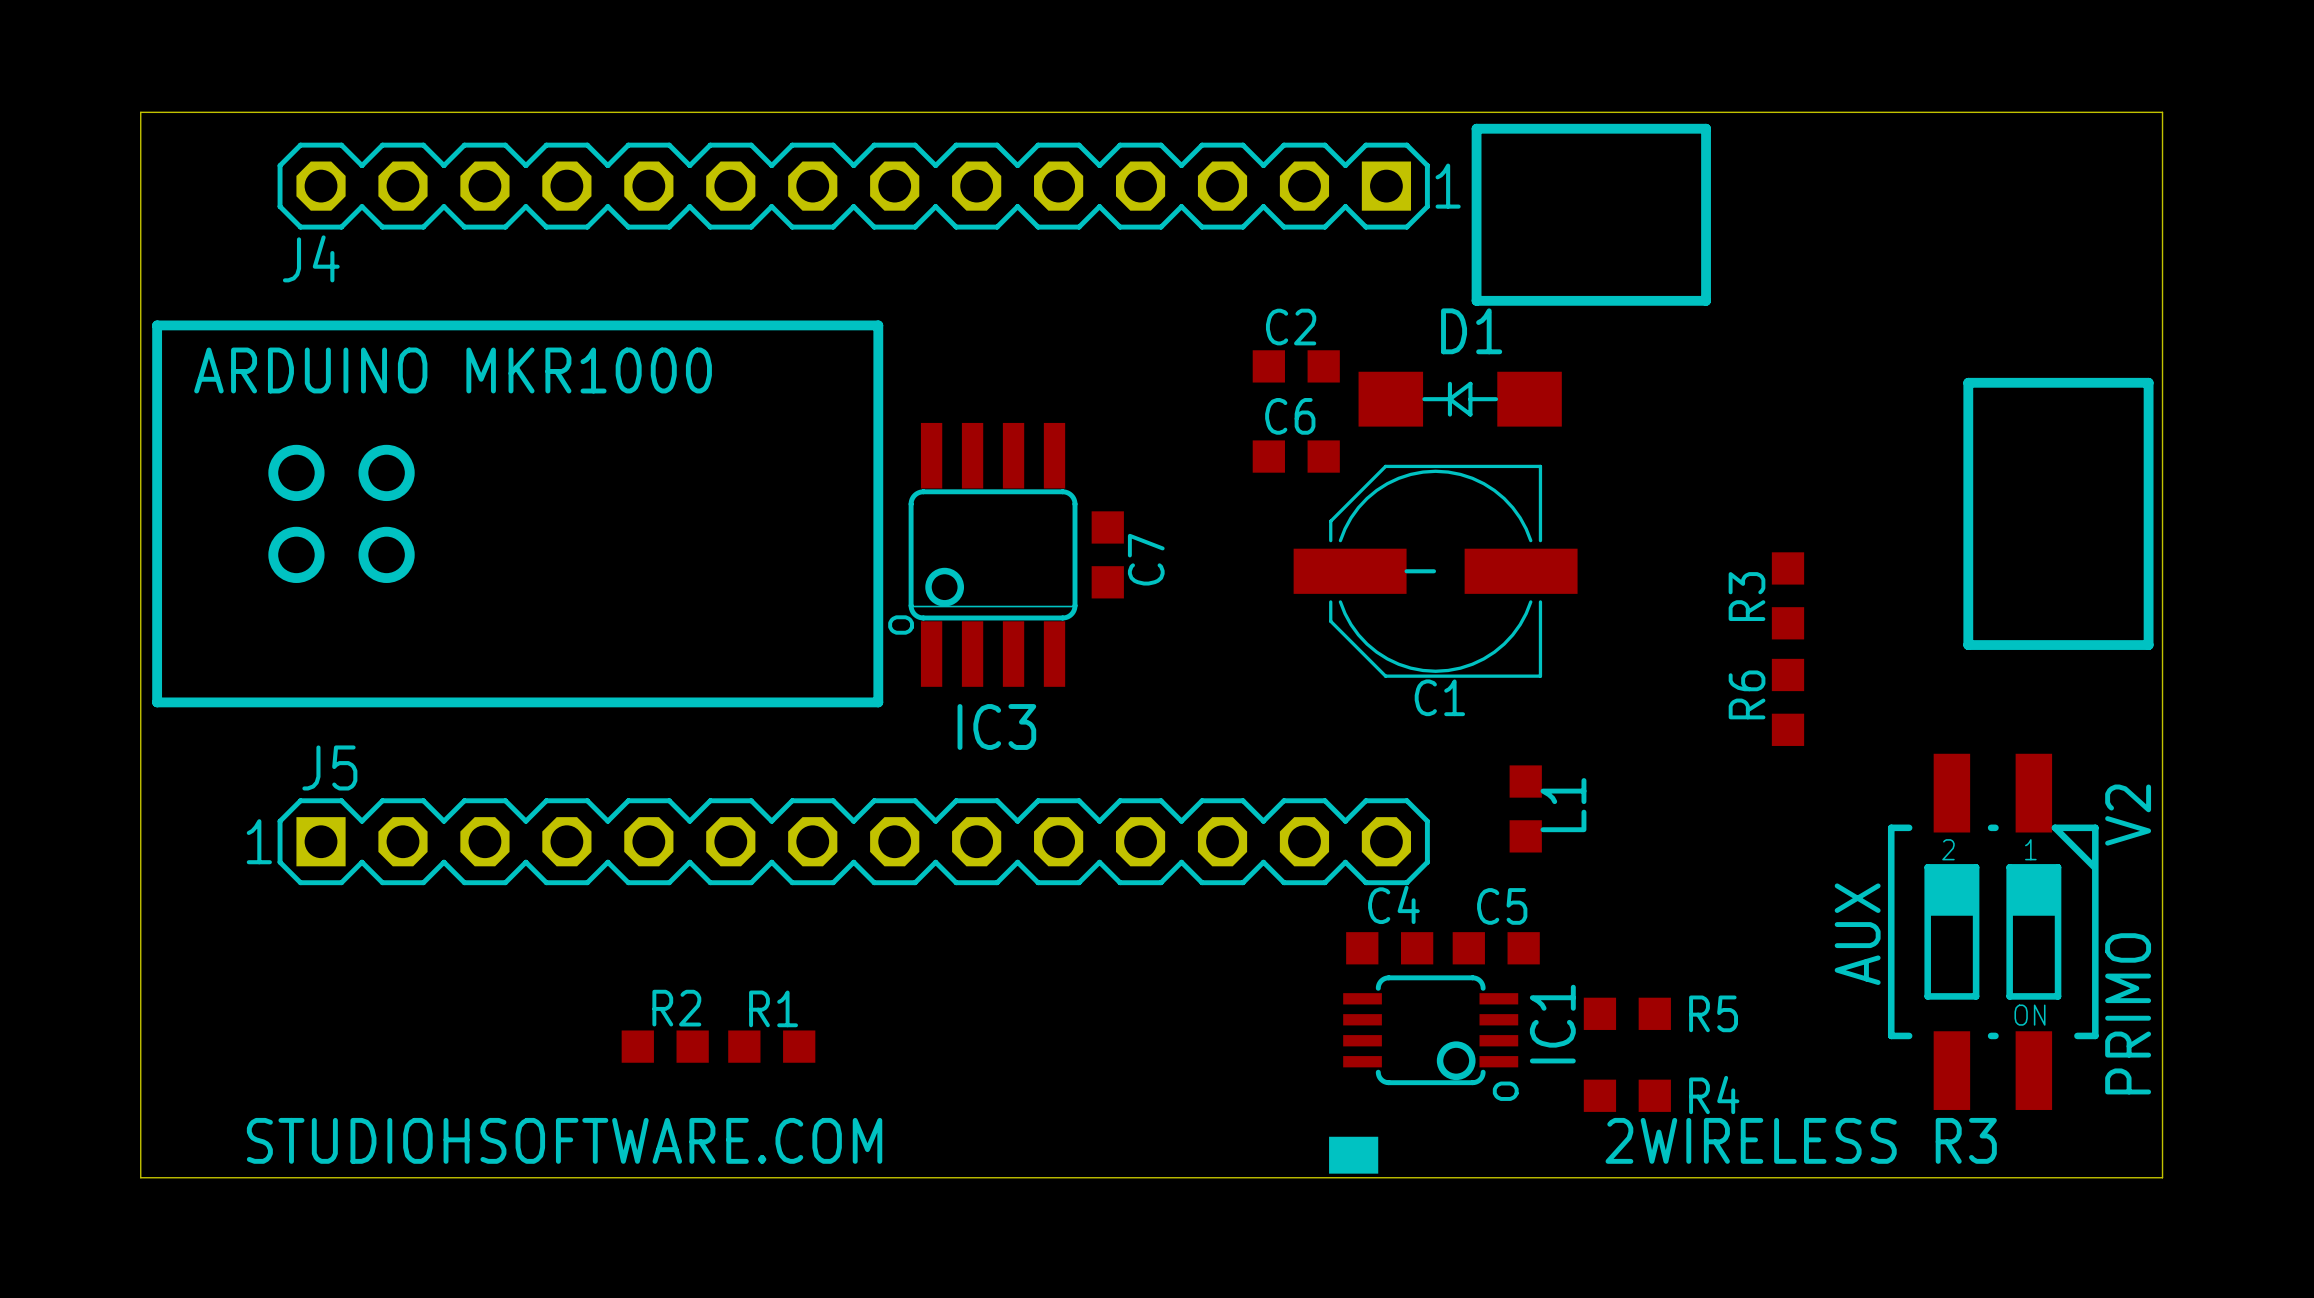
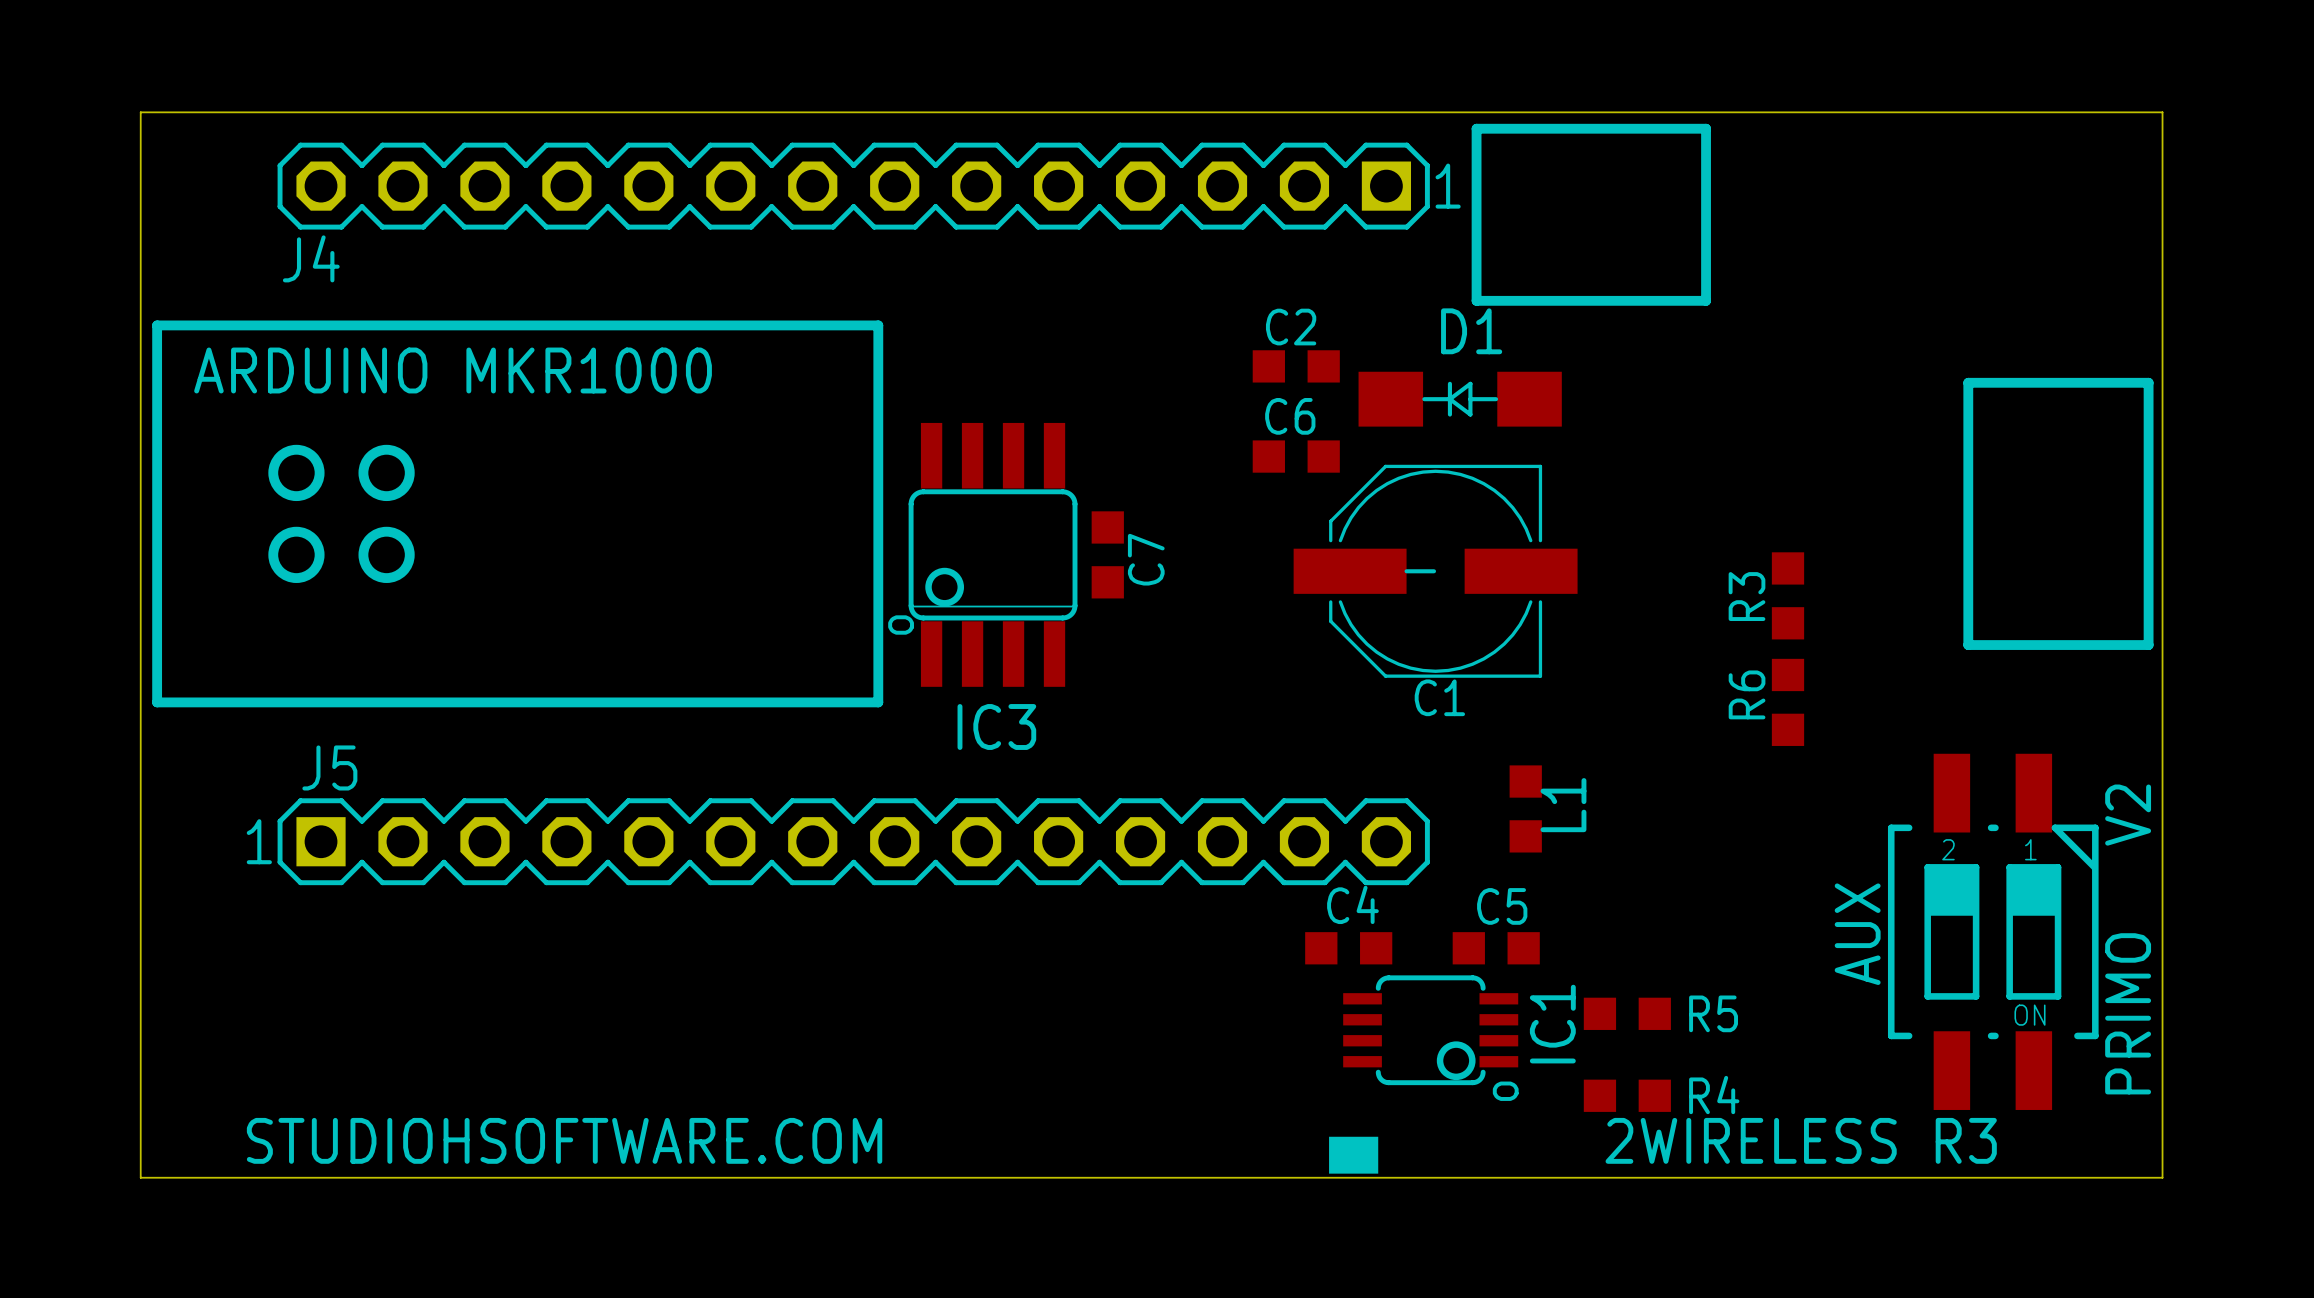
C4 position: (1389, 948) -> (1348, 948)
R2: (665, 1046) -> none
R1: (771, 1046) -> none

